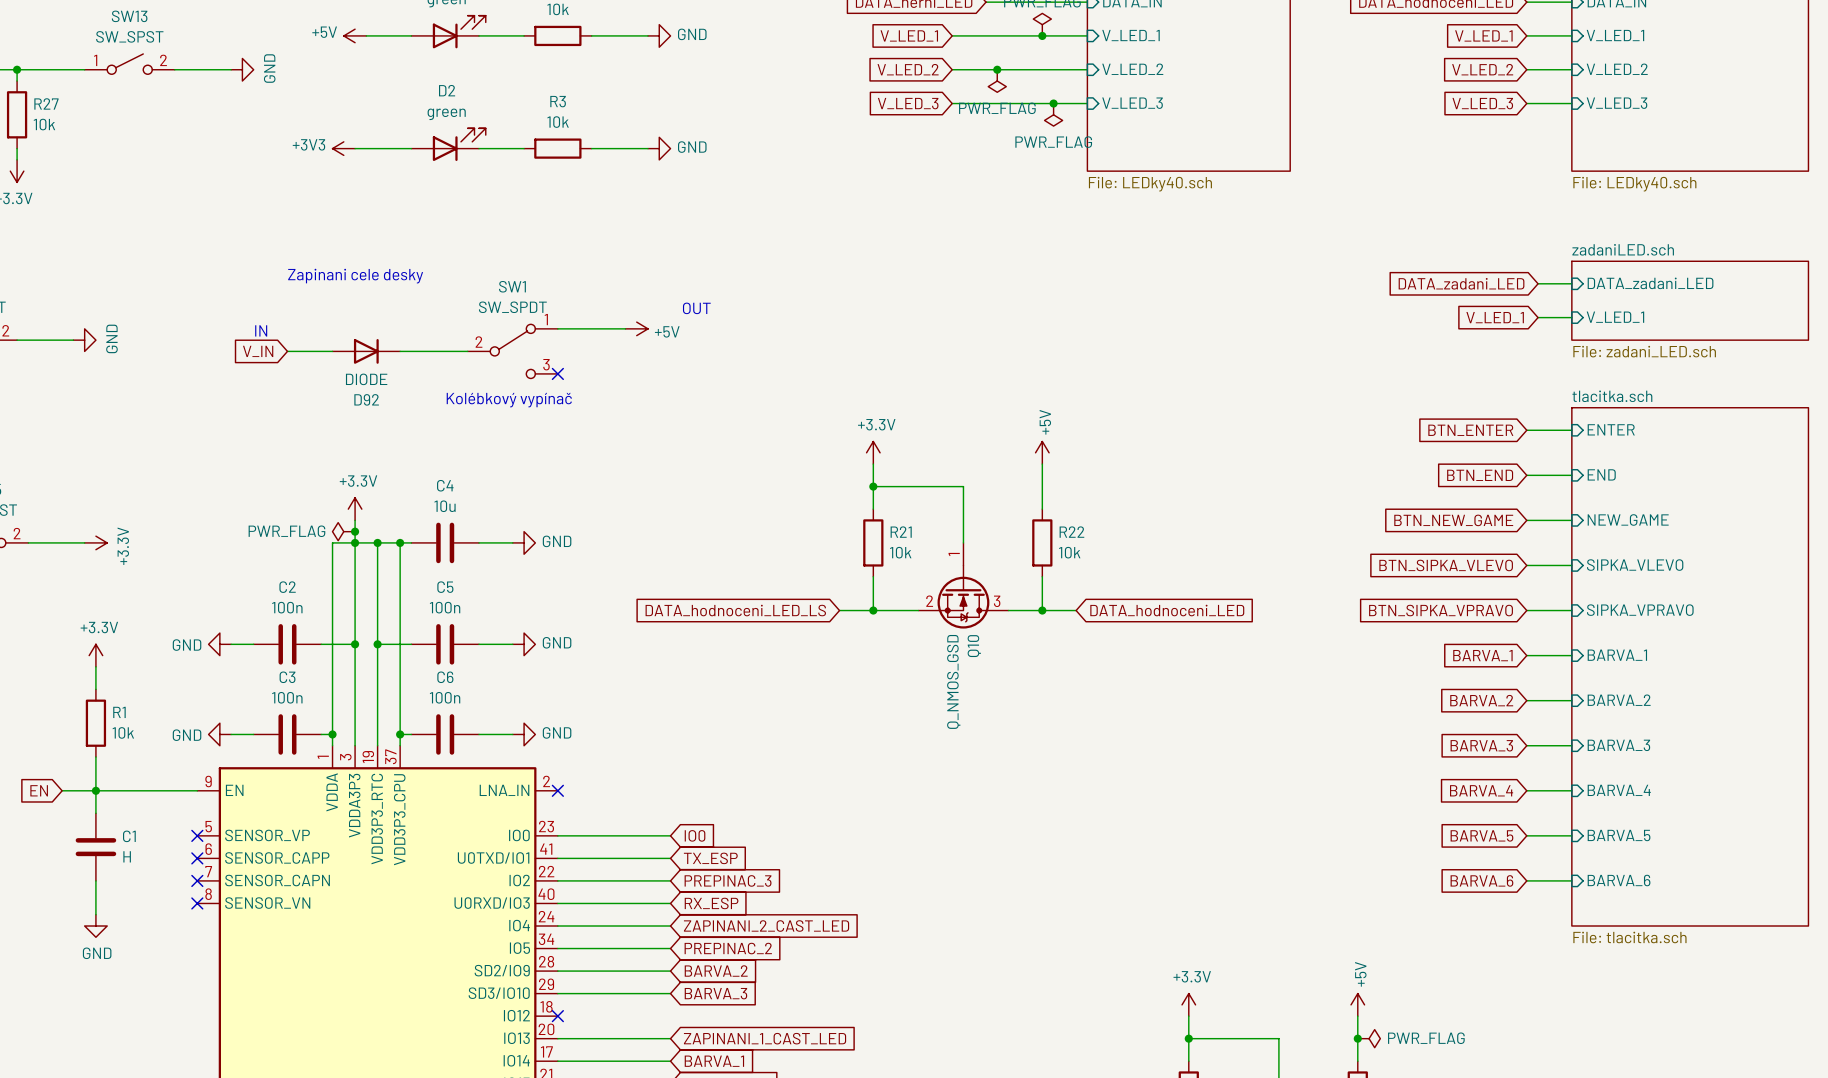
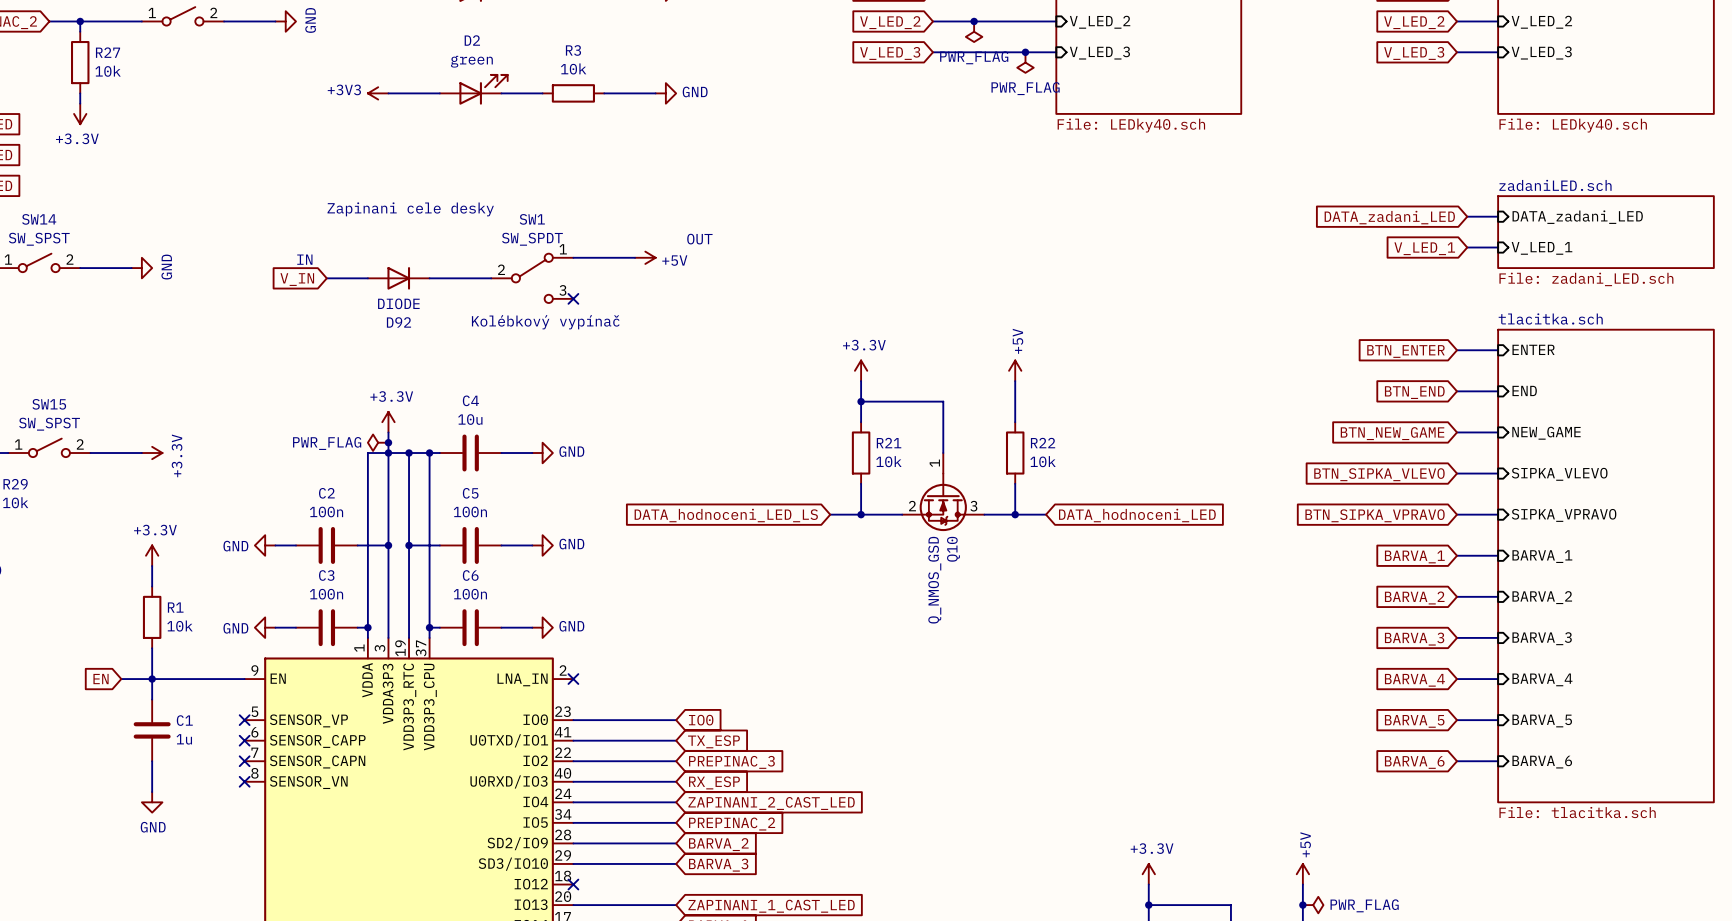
C1 value: H (127, 856) -> 1u (184, 739)

